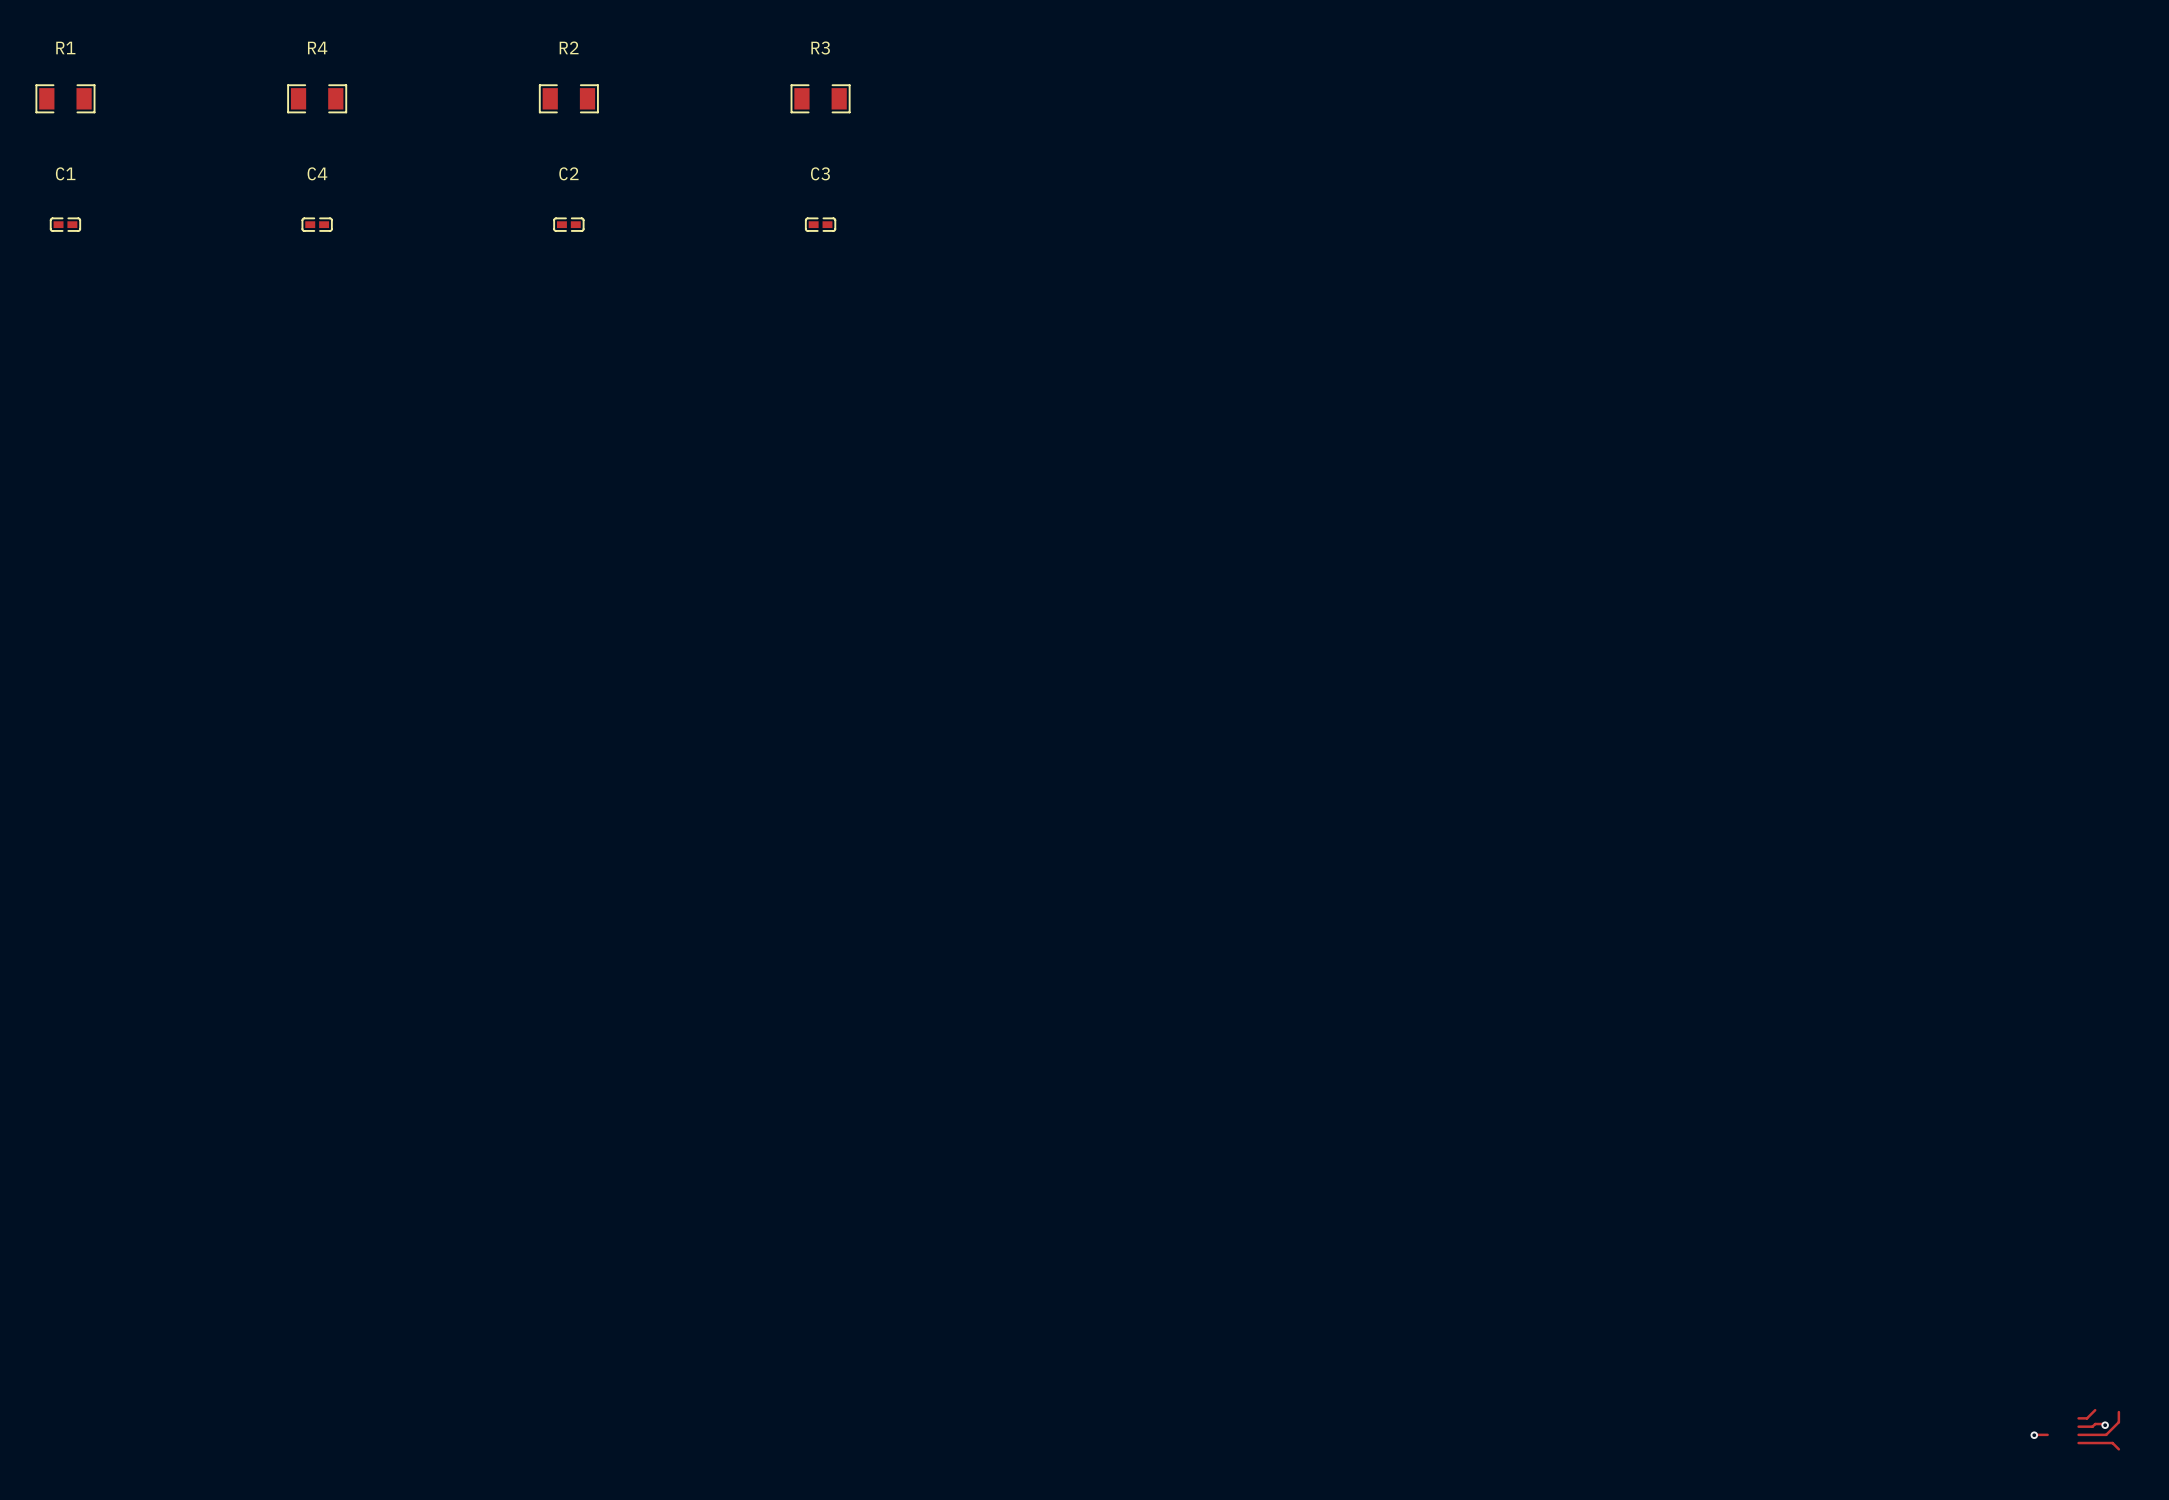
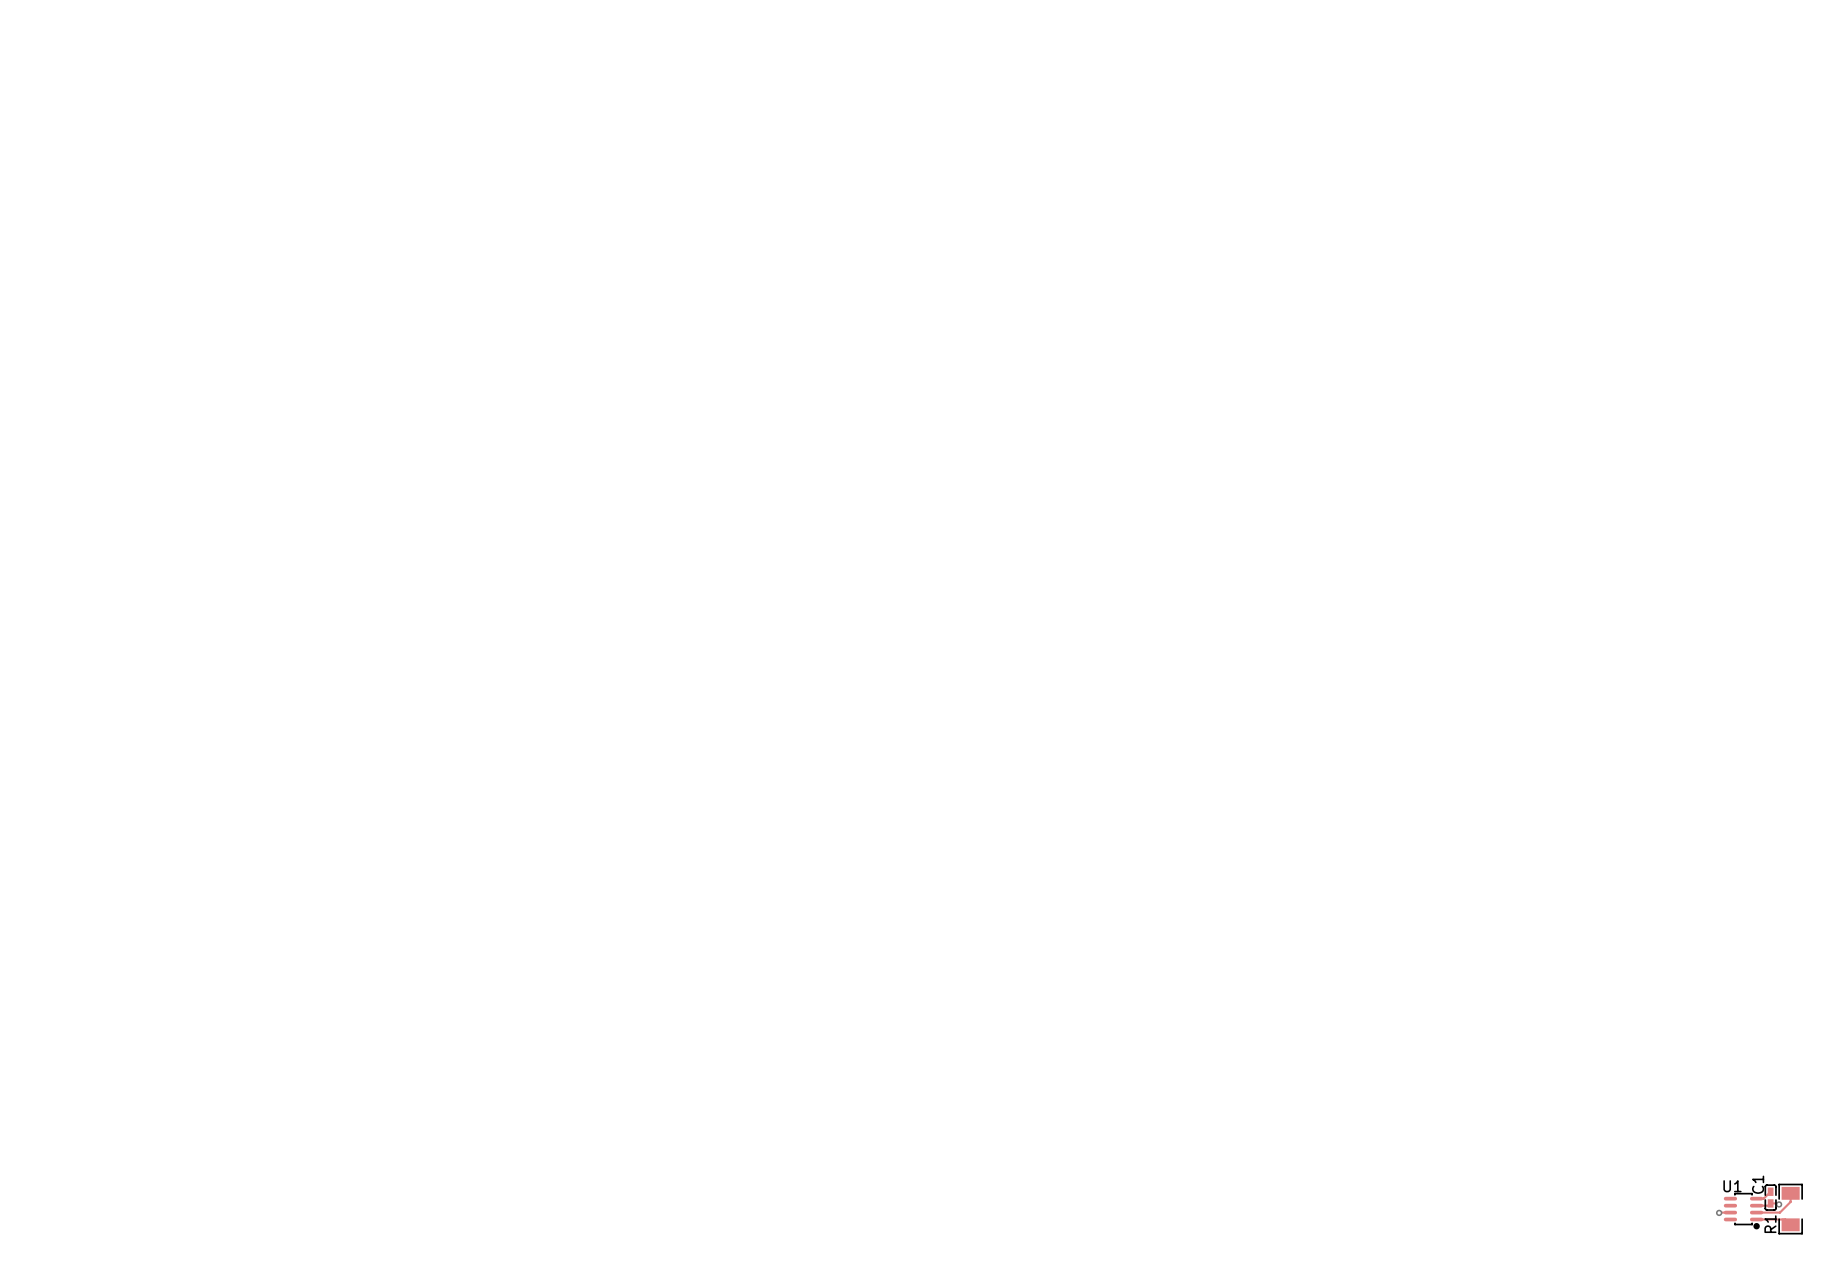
R1 name position: R1 (65, 48) -> R1 (1770, 1224)
R1 rotation: 0° (65, 98) -> 90° clockwise (1790, 1209)
R1 position: (65, 98) -> (1790, 1209)
R4: (317, 98) -> none
R2: (568, 98) -> none
R3: (820, 98) -> none
C1 name position: C1 (65, 173) -> C1 (1758, 1184)
C1 rotation: 0° (65, 224) -> 90° clockwise (1770, 1197)
C1 position: (65, 224) -> (1770, 1197)
C4: (317, 224) -> none
C2: (568, 224) -> none
C3: (820, 224) -> none
U1: none -> (1743, 1211)

